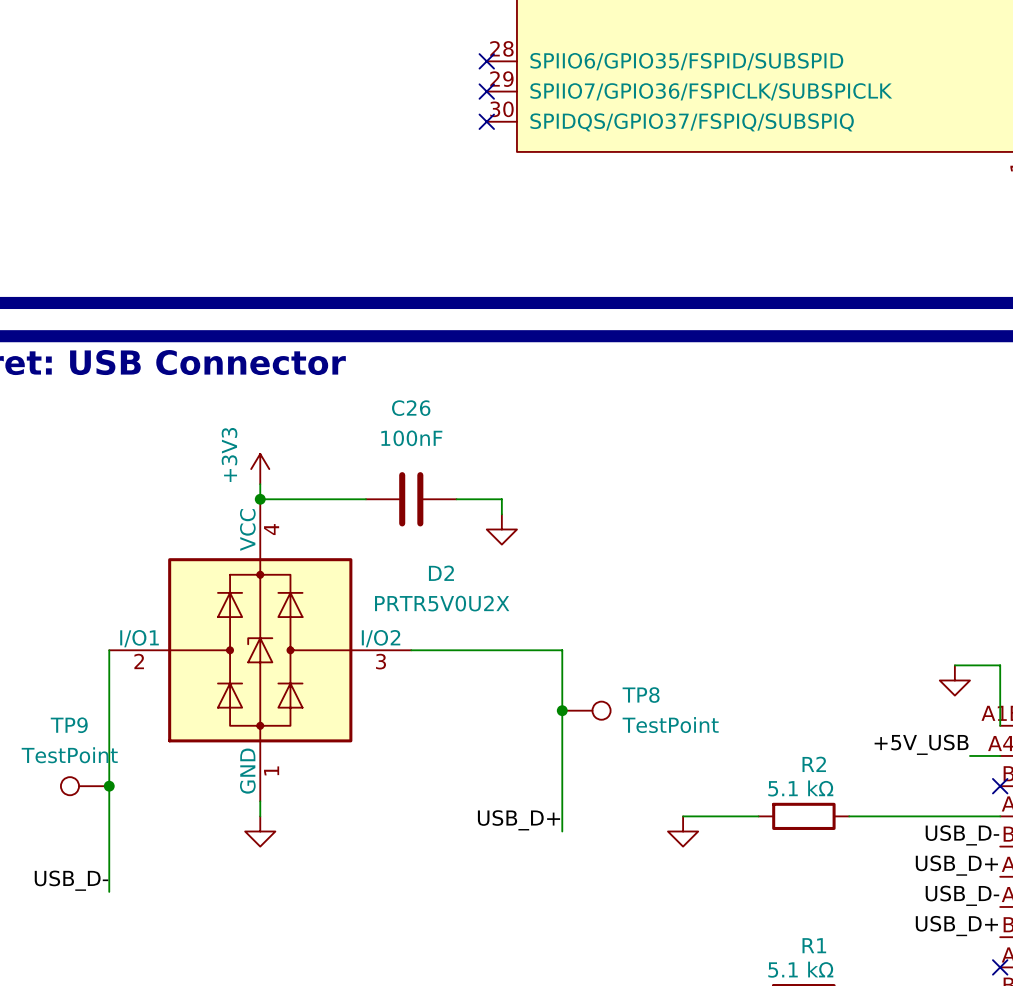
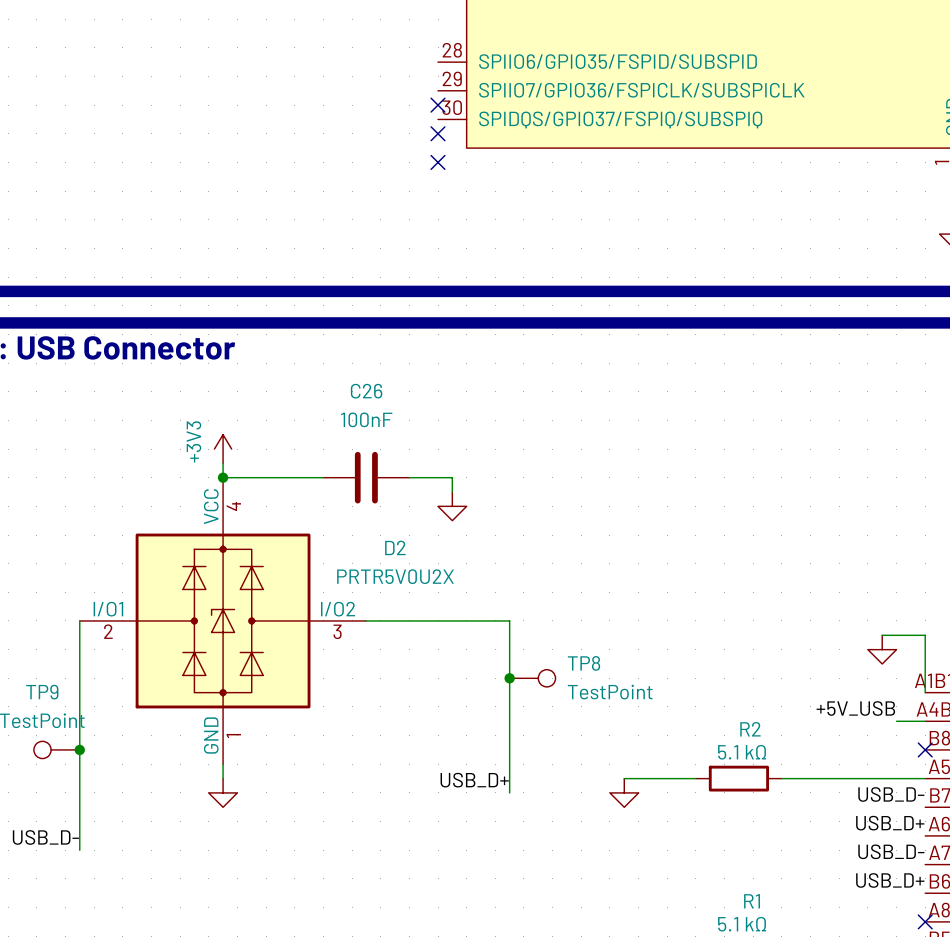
no-connect mark: (486, 61) -> none
no-connect mark: (486, 91) -> none
no-connect mark: none -> (438, 105)
no-connect mark: (486, 121) -> none
no-connect mark: none -> (438, 133)
no-connect mark: none -> (438, 162)

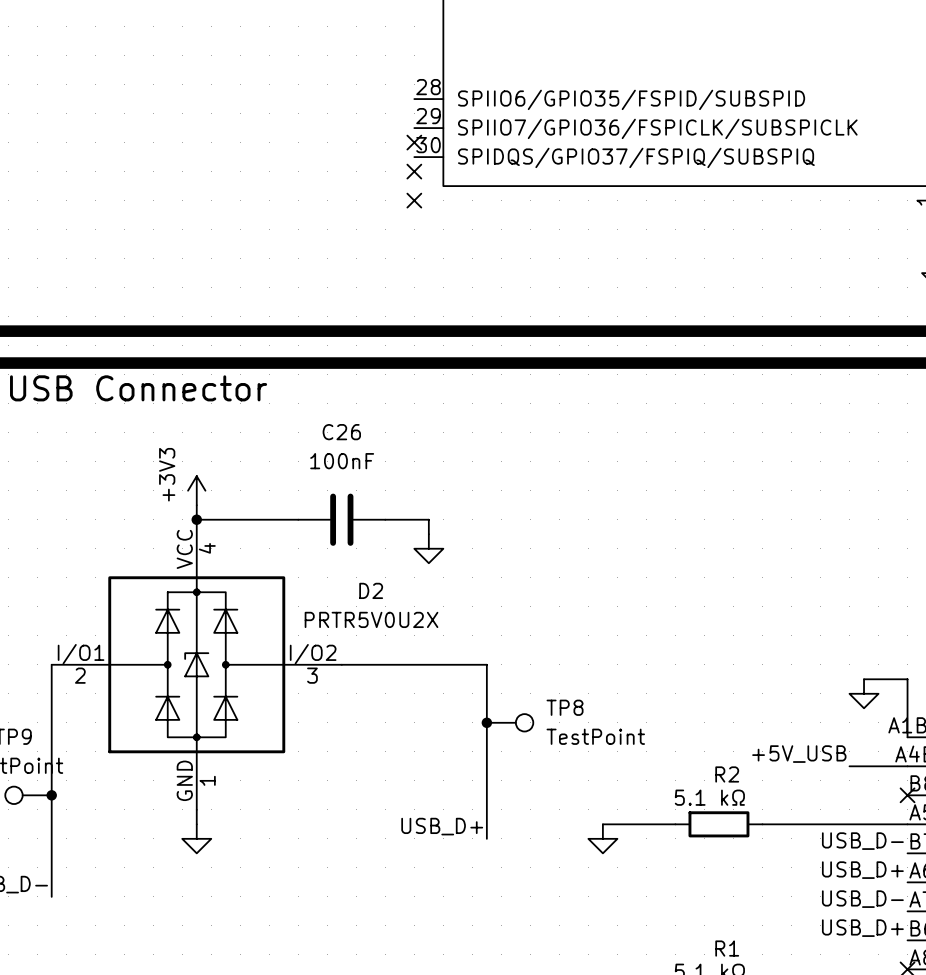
label position: +5V_USB (855, 708) -> +5V_USB (799, 754)
wire: none -> (849, 766) (878, 766)

